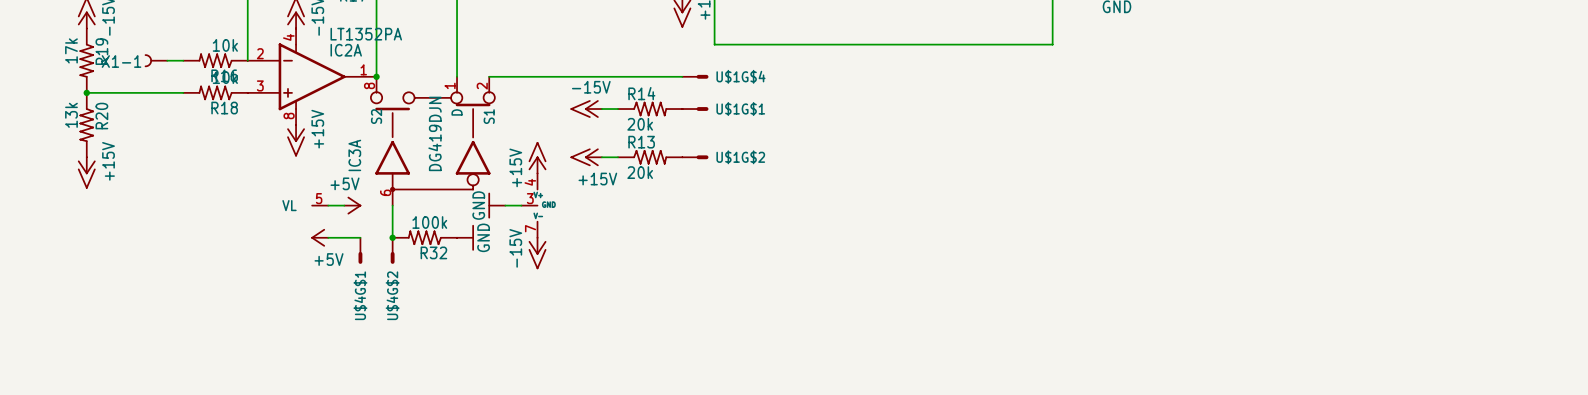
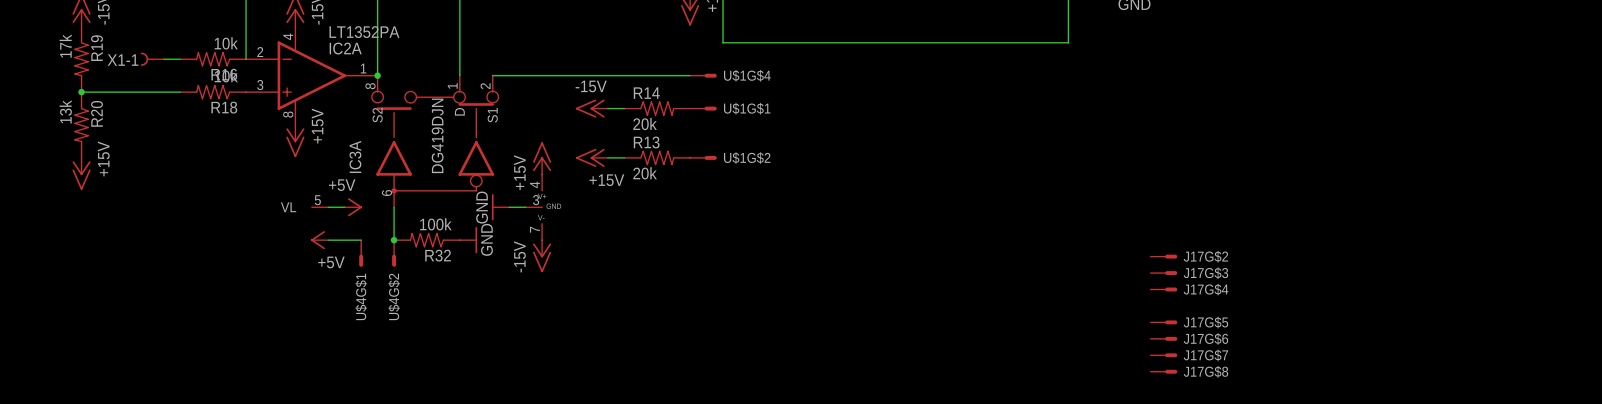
J17G$2: none -> (1163, 256)
J17G$3: none -> (1163, 273)
J17G$4: none -> (1163, 289)
J17G$5: none -> (1163, 322)
J17G$6: none -> (1163, 338)
J17G$7: none -> (1163, 355)
J17G$8: none -> (1163, 371)

